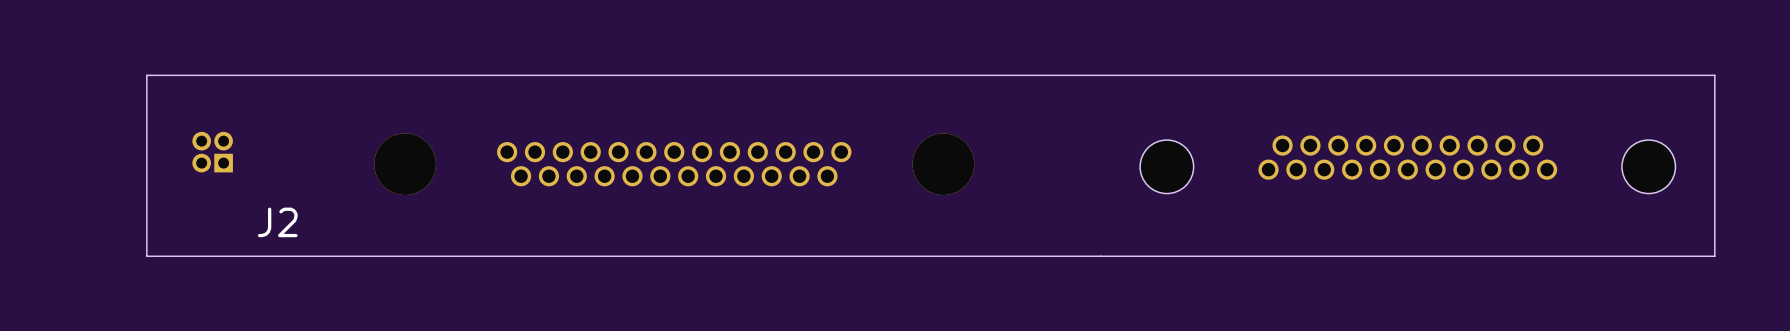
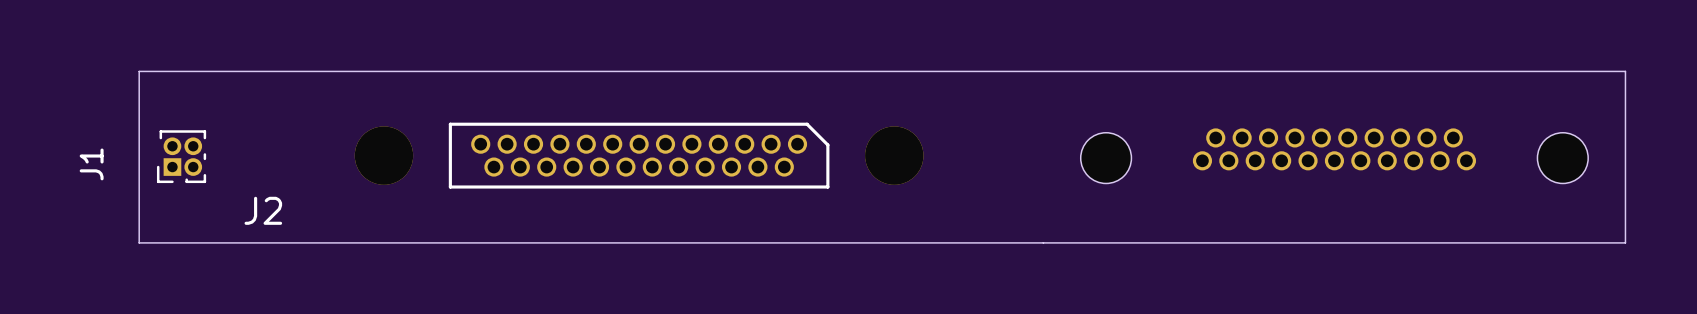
J2 footprint: [374, 133, 975, 195] -> [354, 122, 924, 189]
J1 side: bottom (212, 152) -> top (181, 156)

